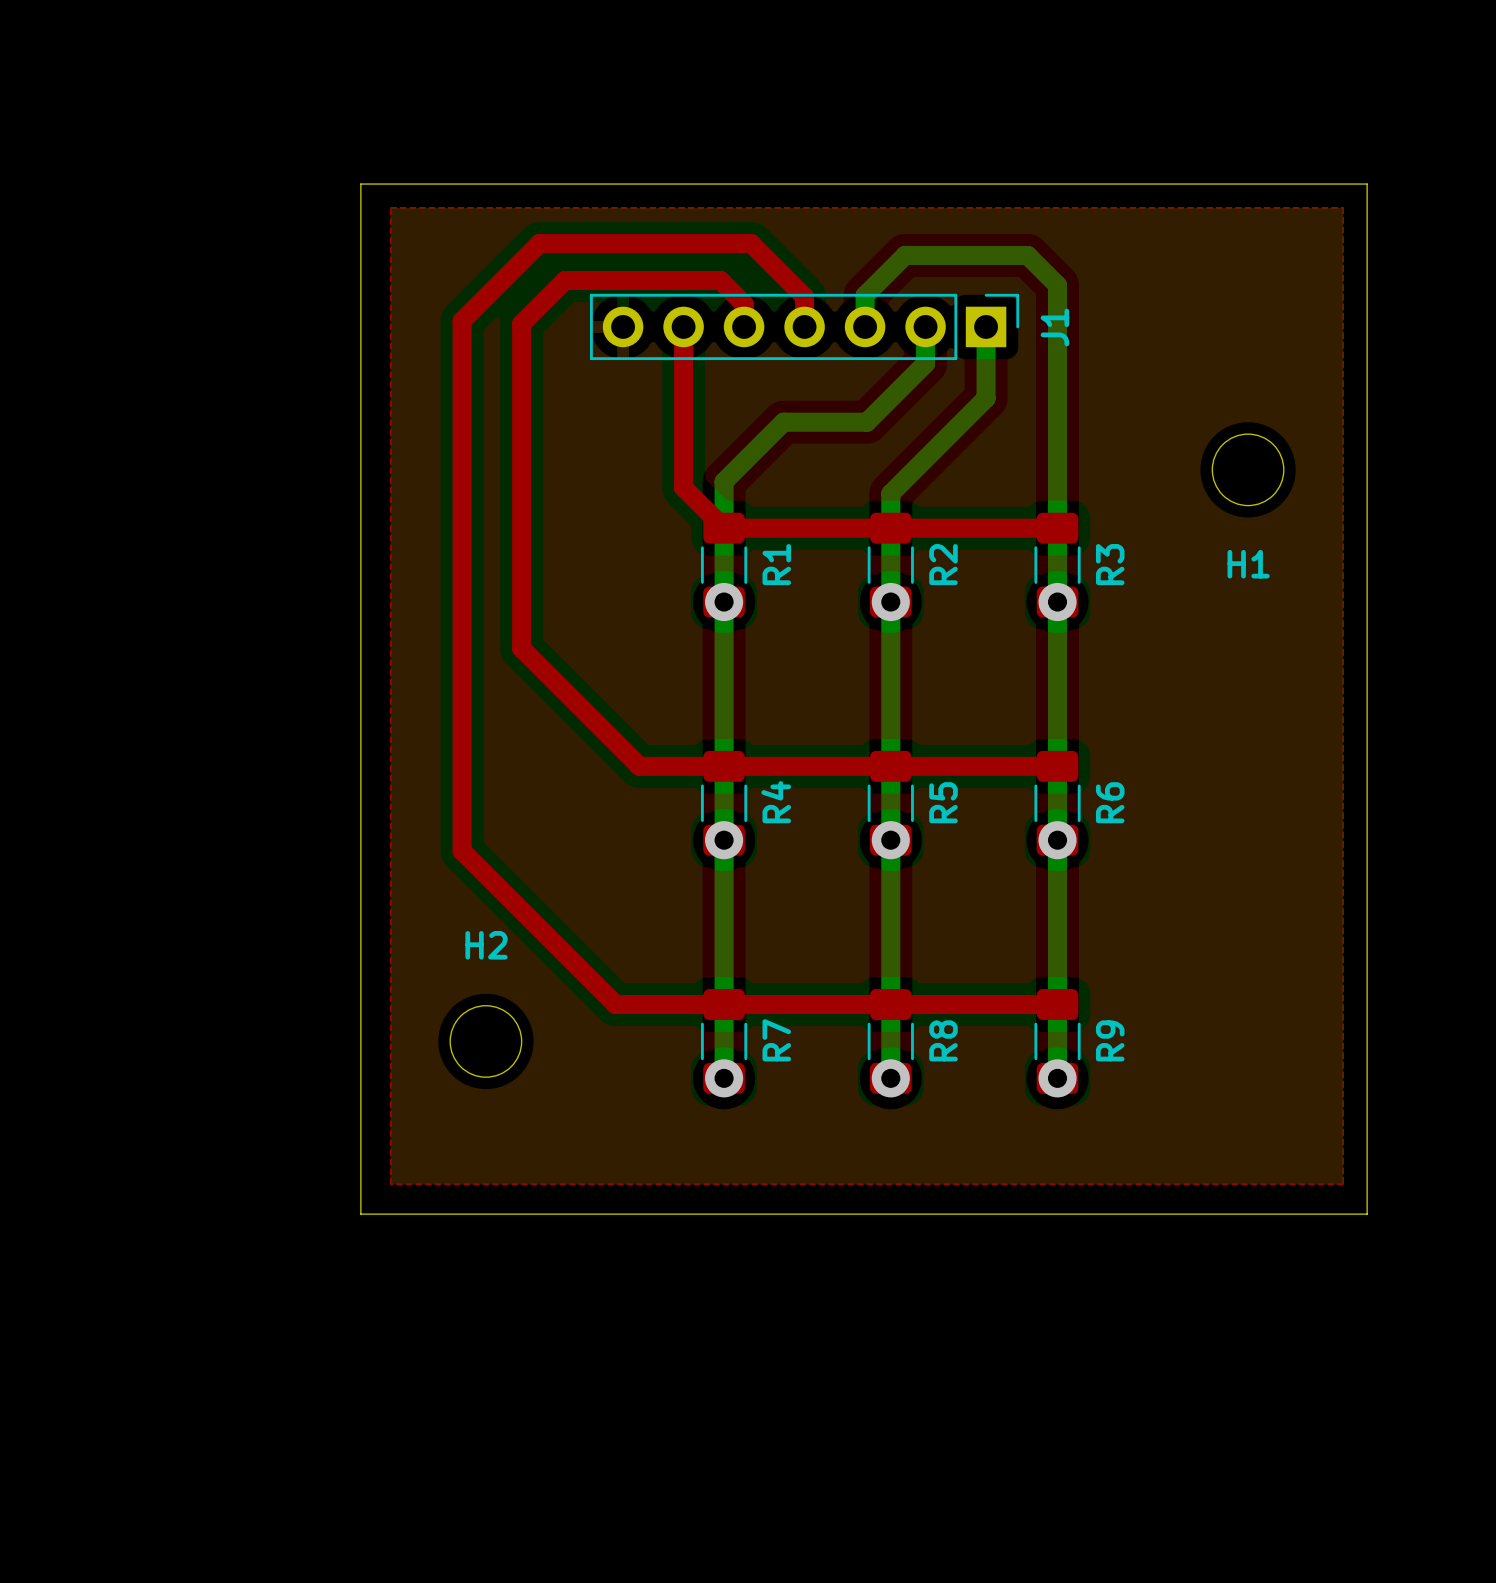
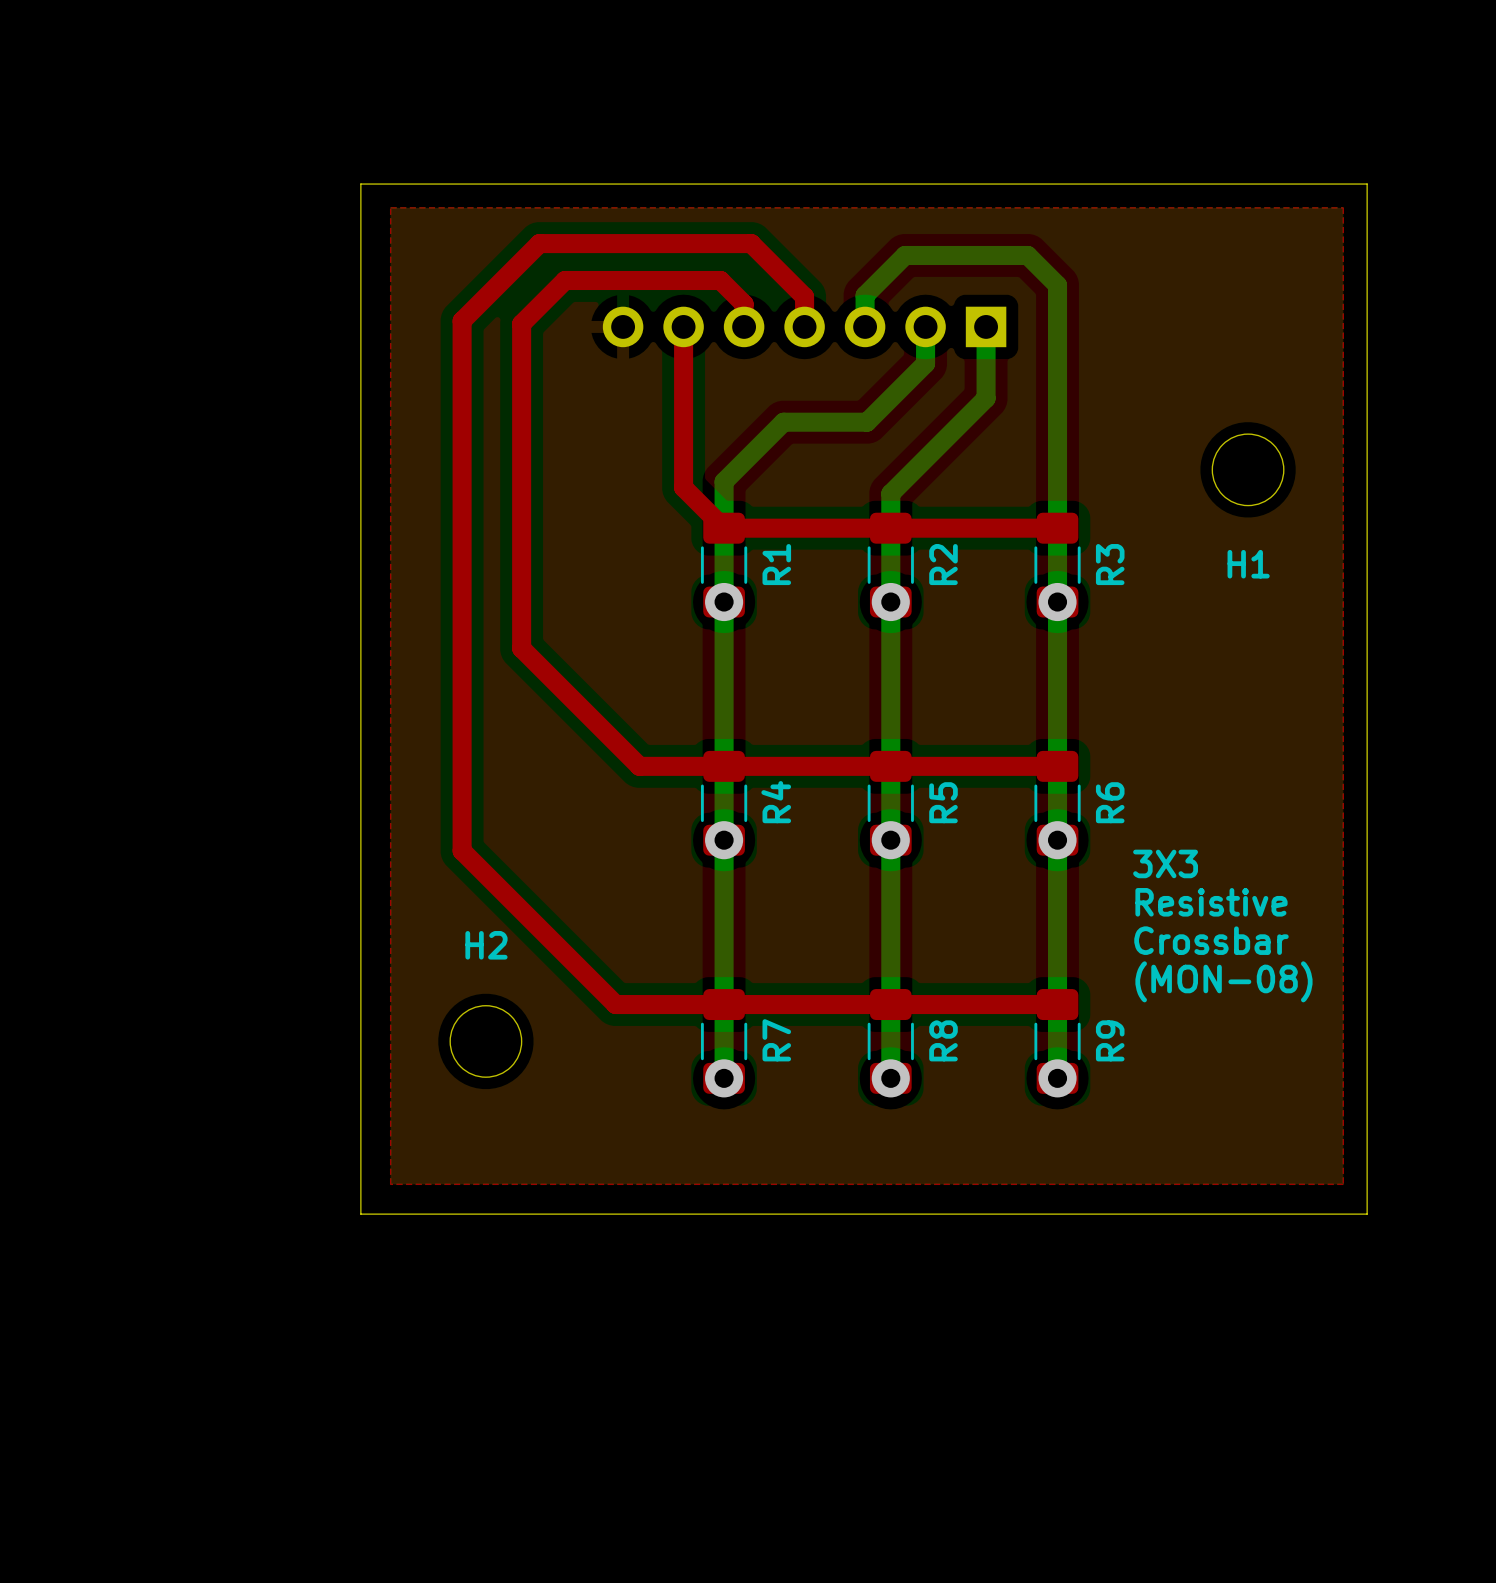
J1 side: top (804, 326) -> bottom (804, 326)
text: none -> 3X3 (1165, 863)
text: none -> Resistive (1211, 902)
text: none -> Crossbar (1211, 940)
text: none -> (MON-08) (1223, 981)

